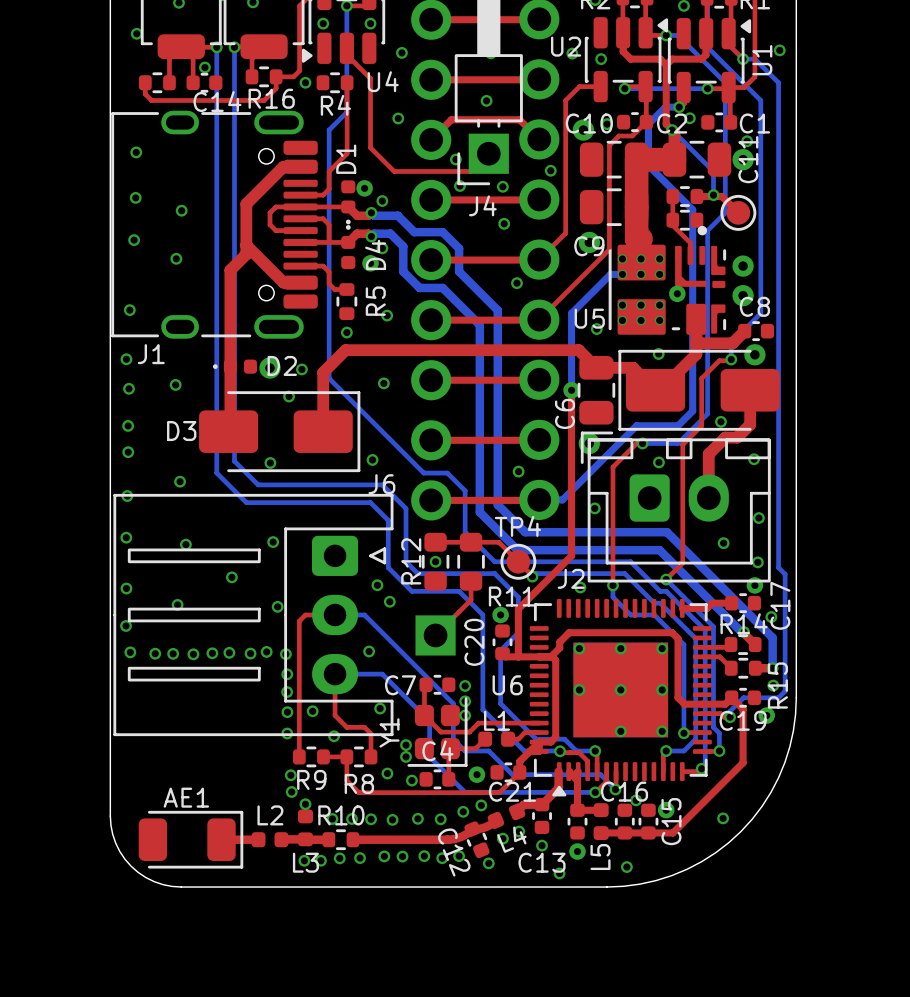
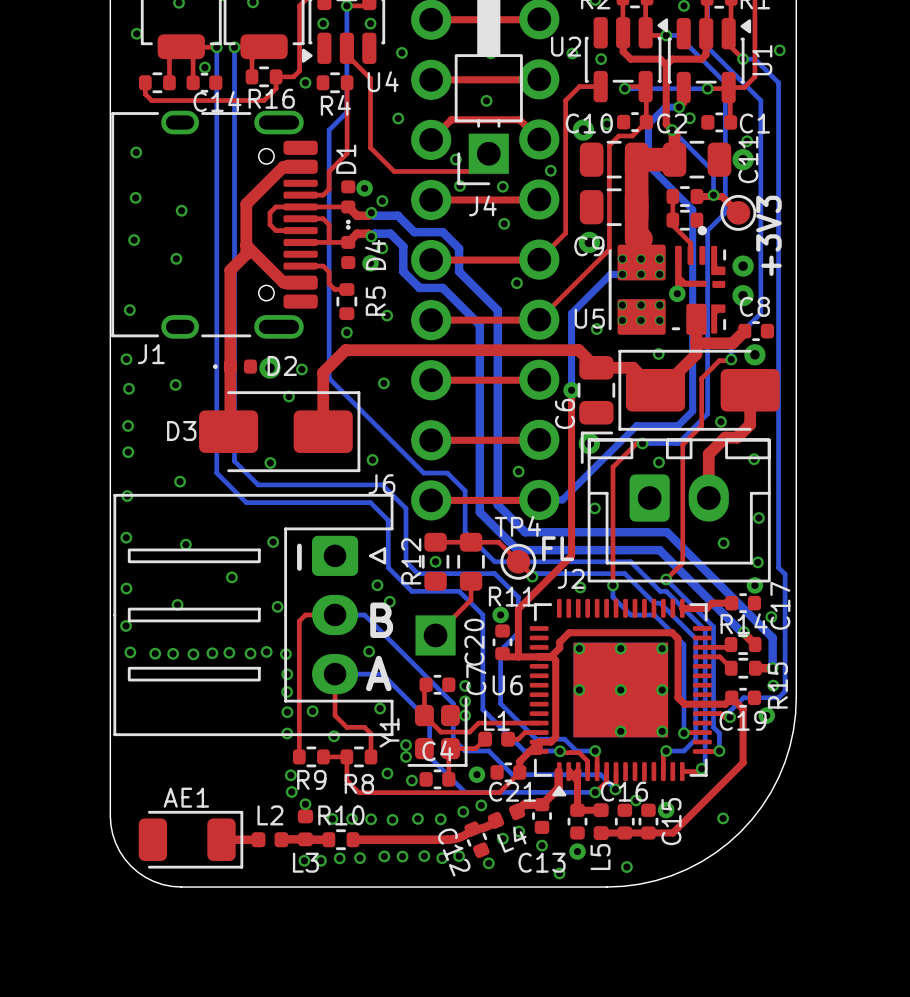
text: none -> +3V3 (768, 235)
text: none -> FL (558, 548)
text: none -> - (299, 557)
text: none -> B (381, 620)
text: none -> A (378, 673)
C7 name rotation: 0° (400, 685) -> 90° counterclockwise (476, 679)
C7 name position: C7 (400, 685) -> C7 (476, 679)

